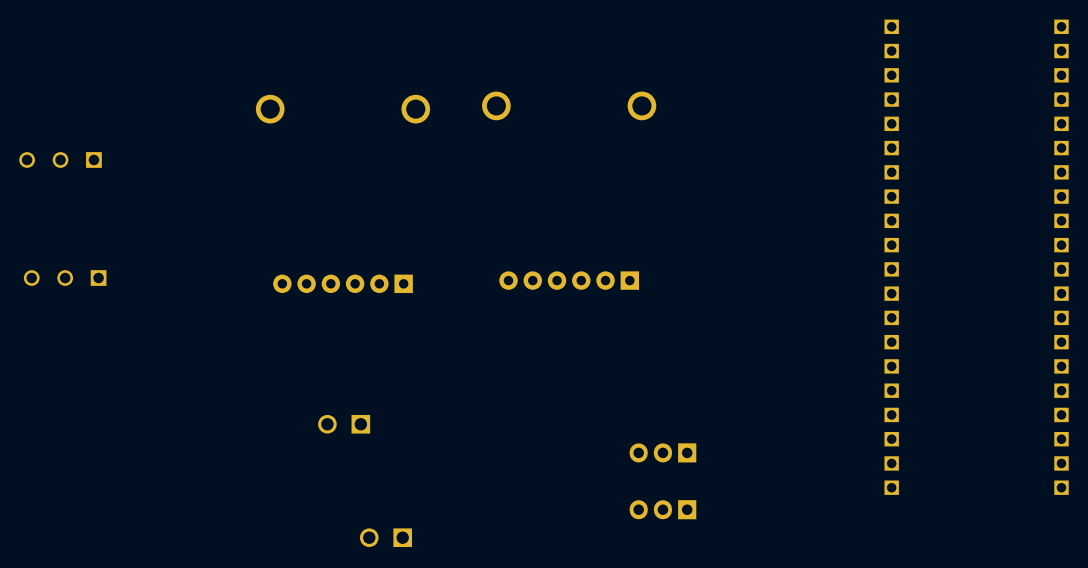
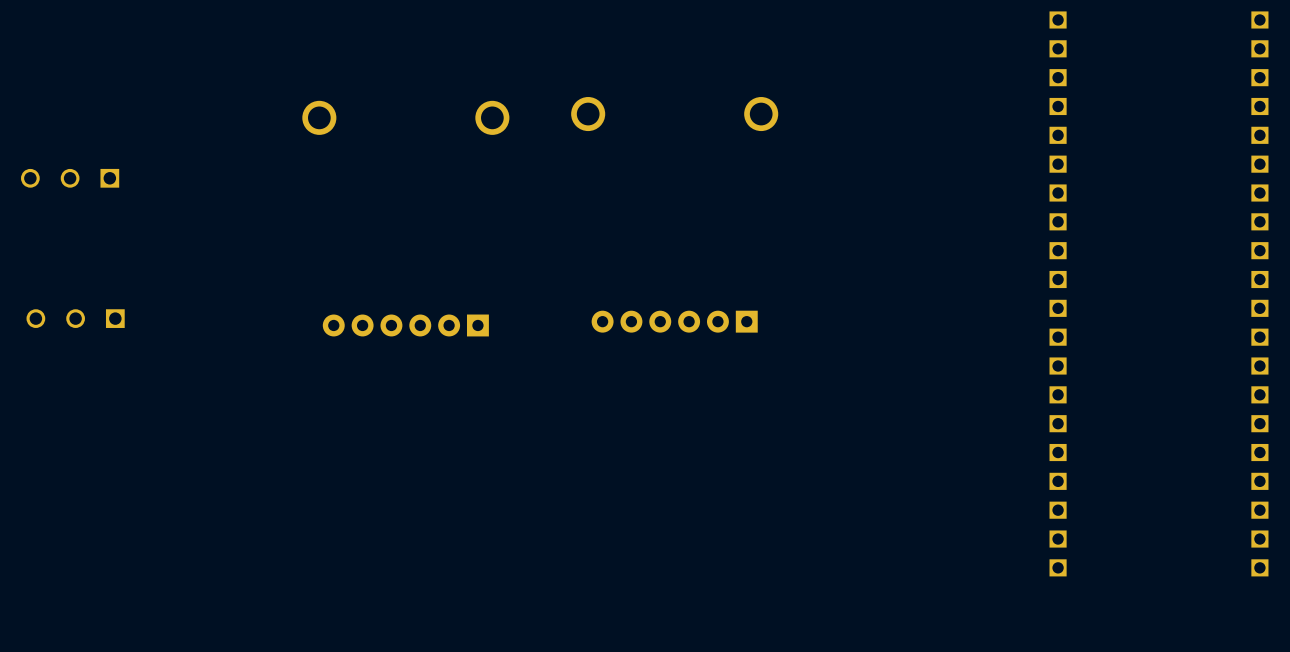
part: (344, 424) -> none
part: (662, 452) -> none
part: (662, 509) -> none
part: (385, 537) -> none

